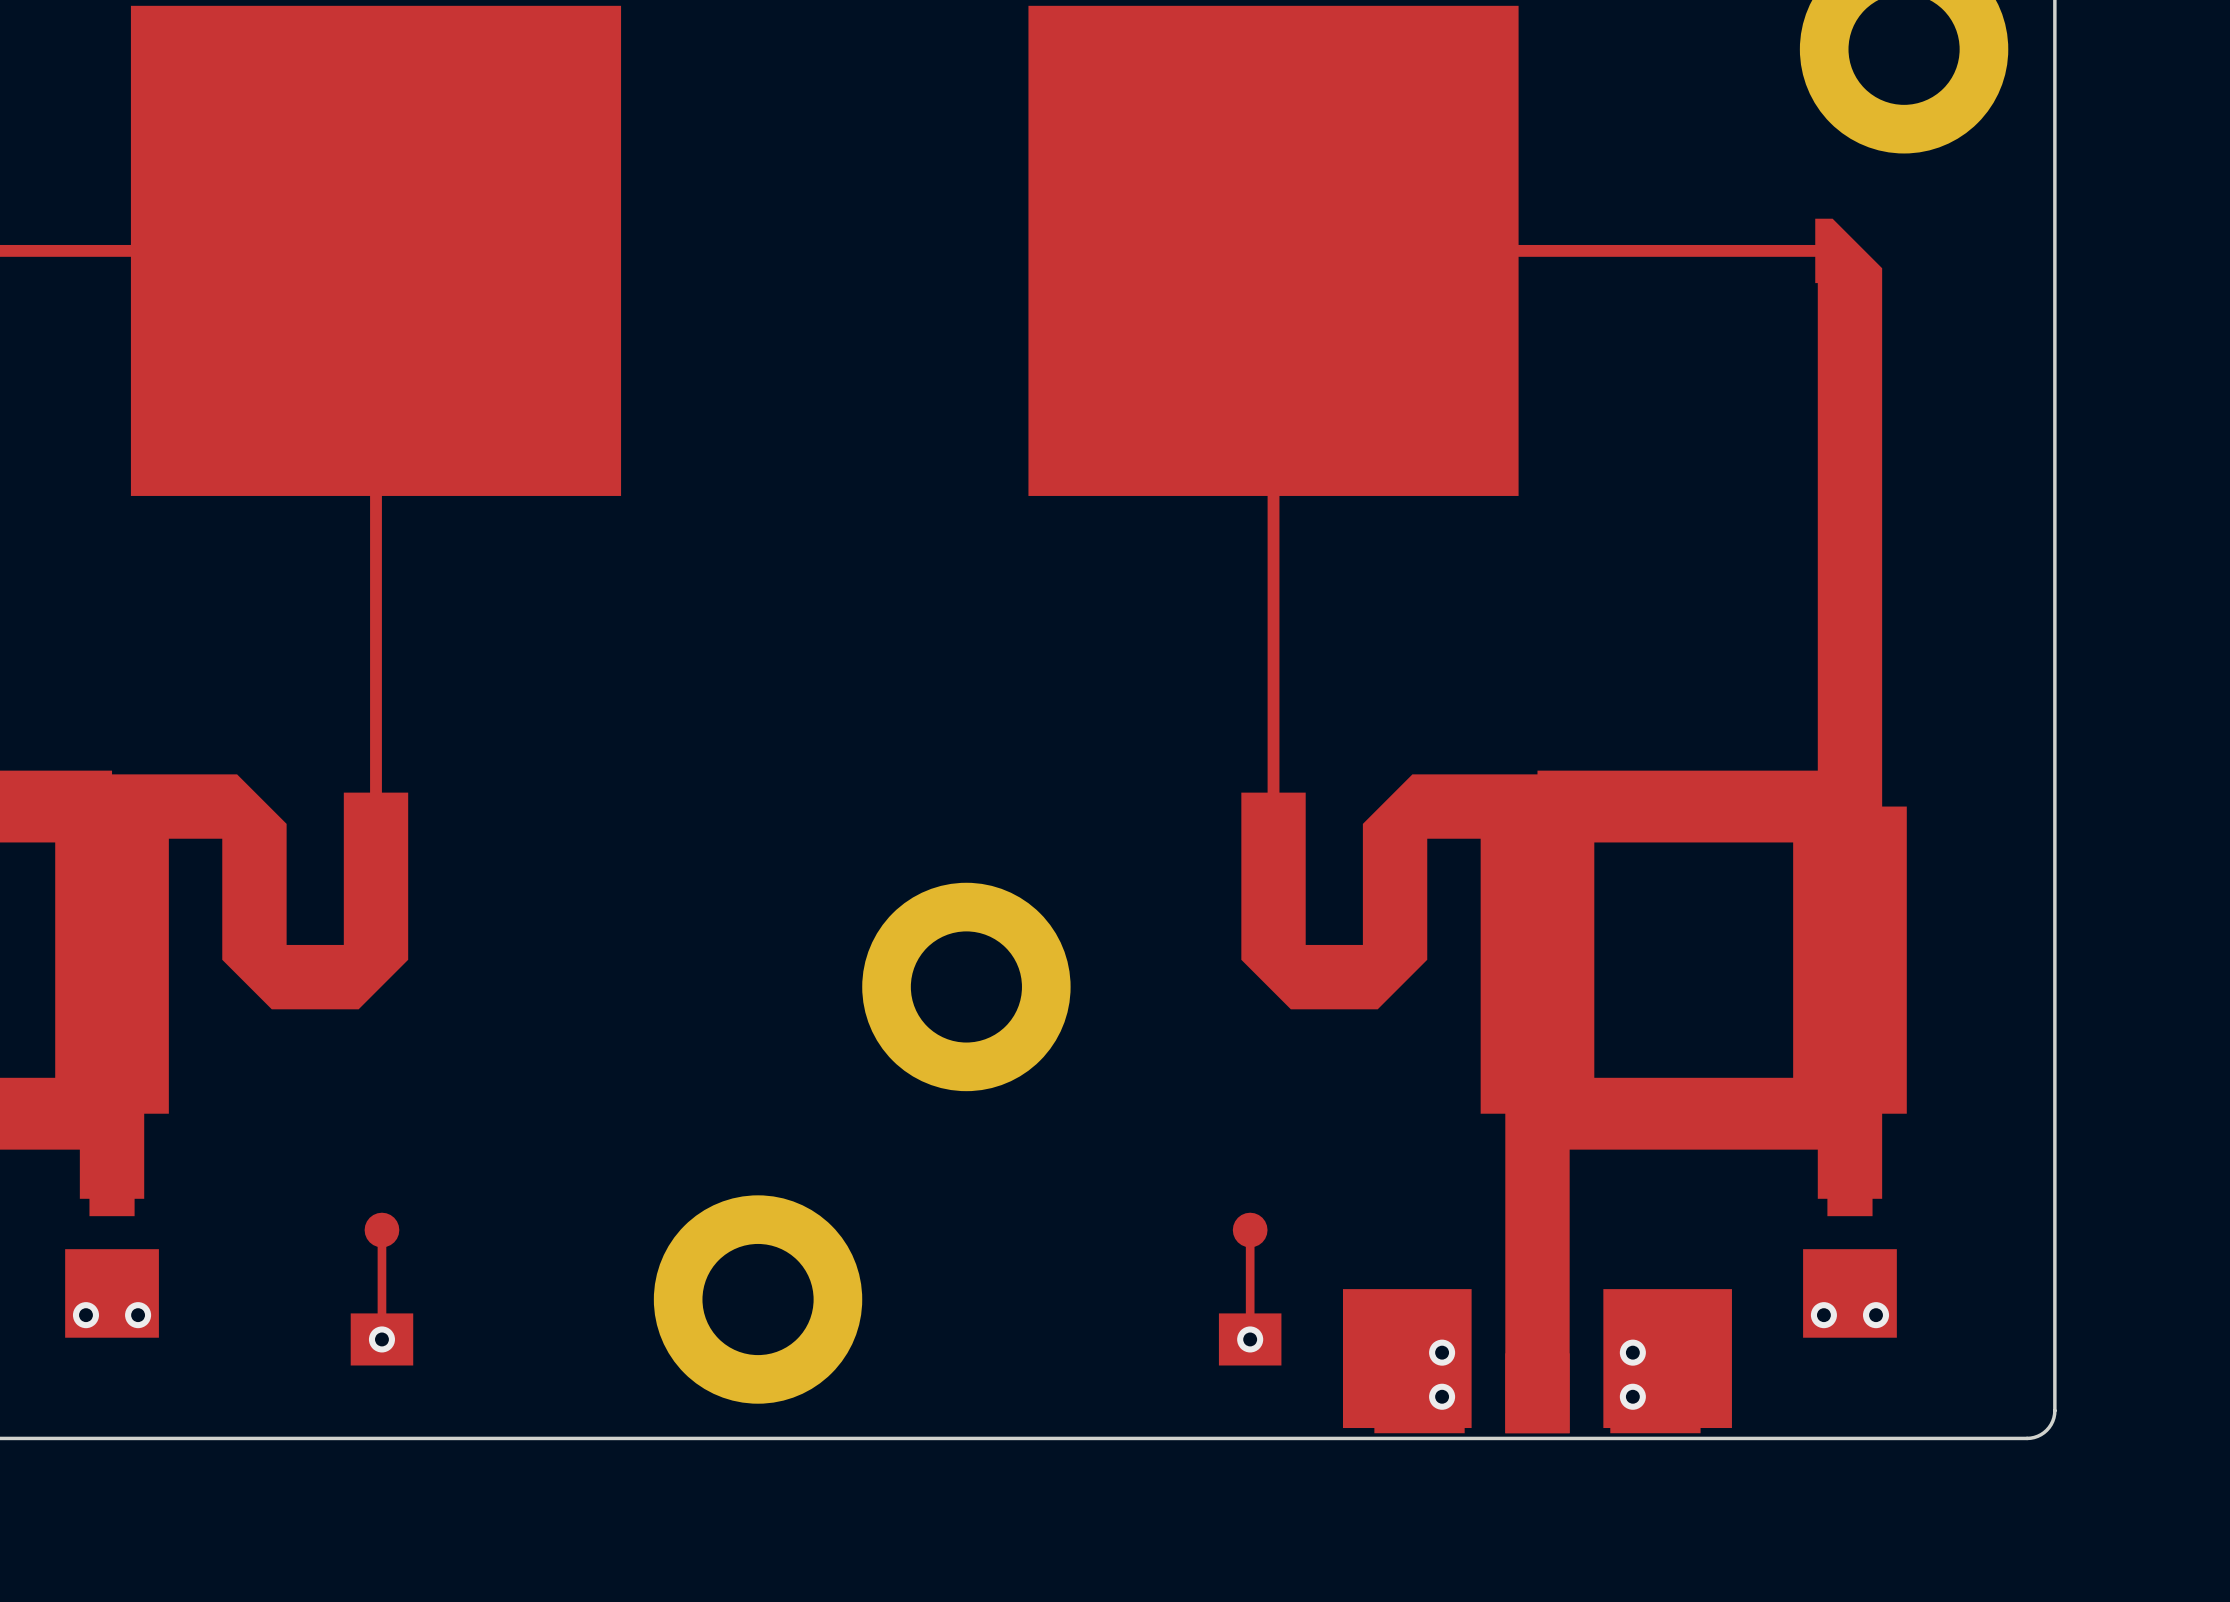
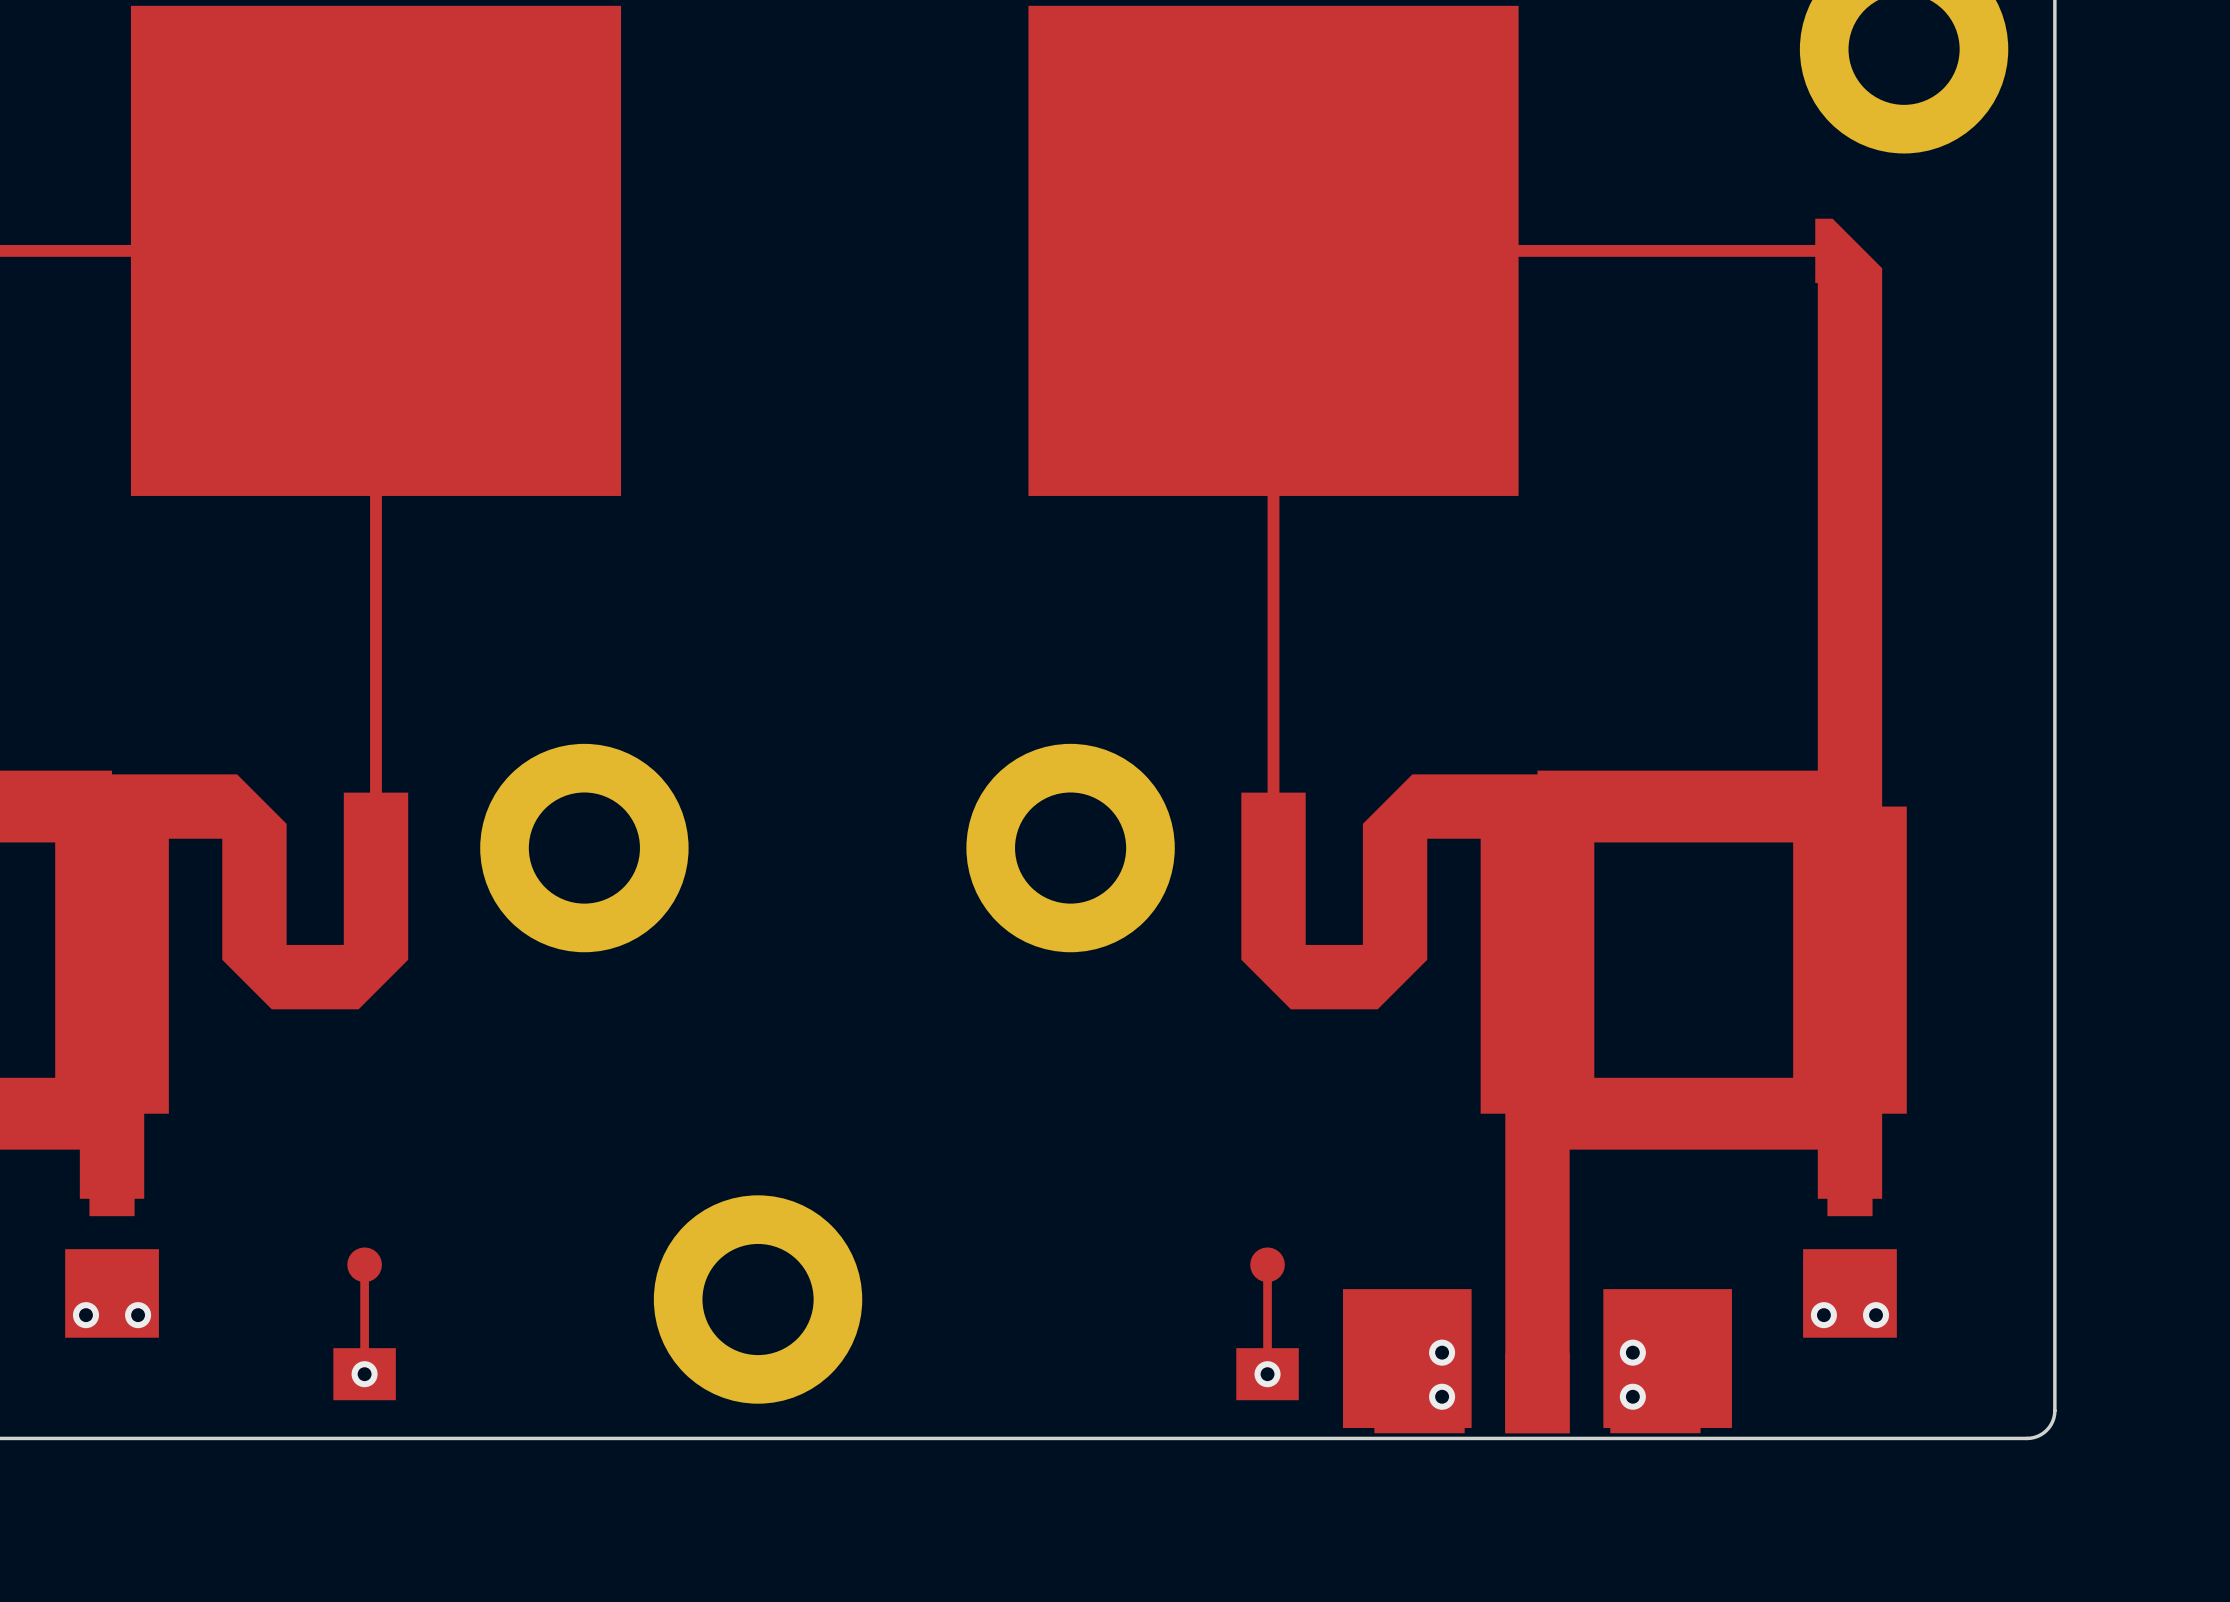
part: none -> (584, 848)
part position: (966, 986) -> (1070, 848)
drawing position: (381, 1289) -> (364, 1323)
drawing position: (1250, 1289) -> (1267, 1323)
via position: (381, 1339) -> (364, 1374)
via position: (1250, 1339) -> (1267, 1374)

